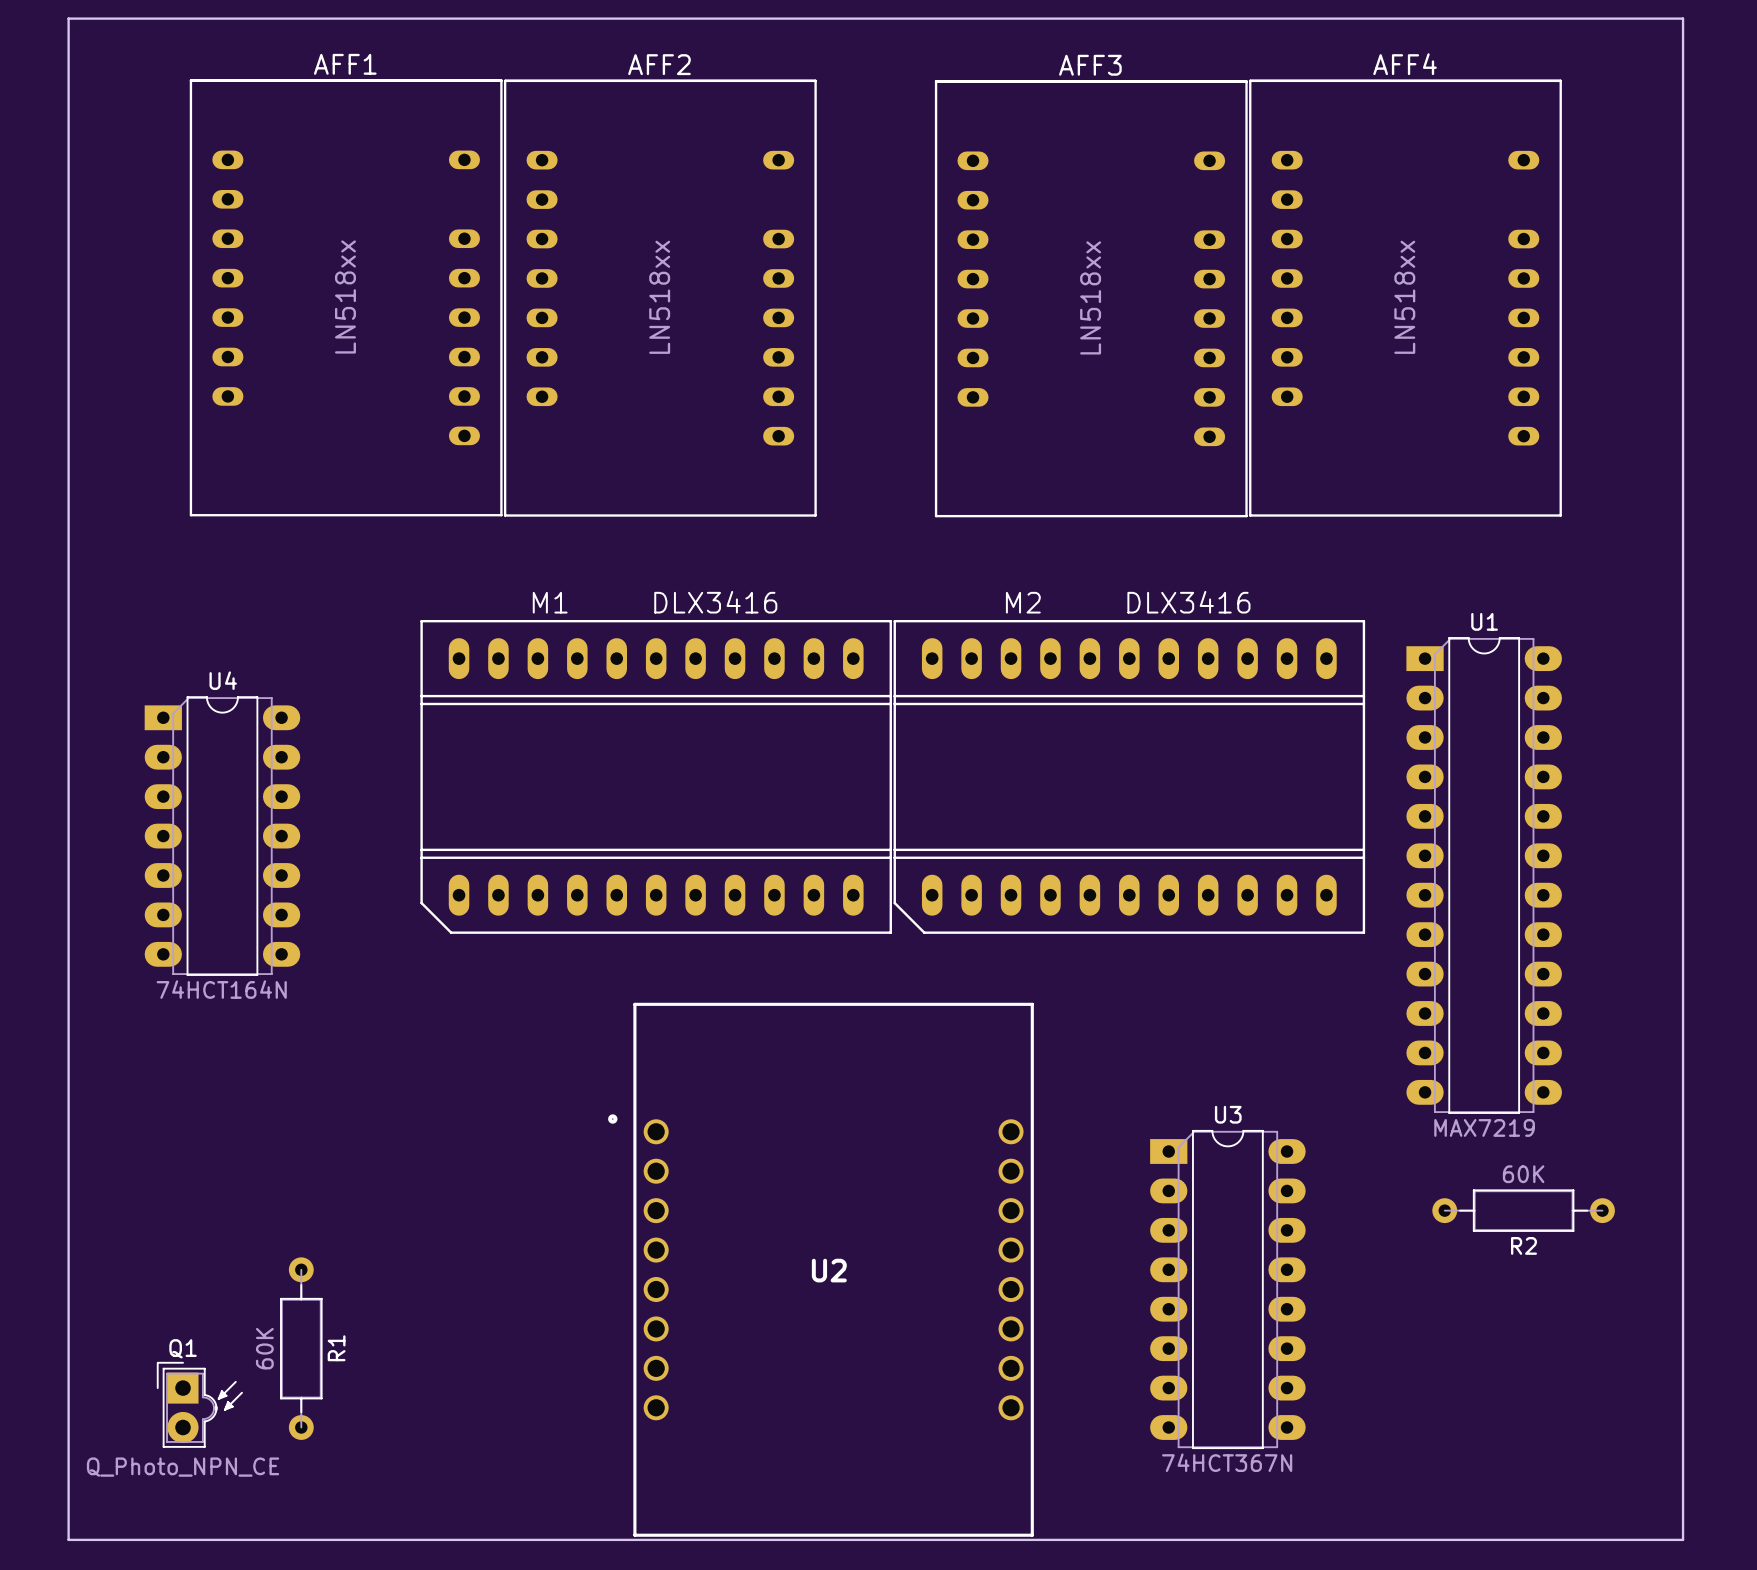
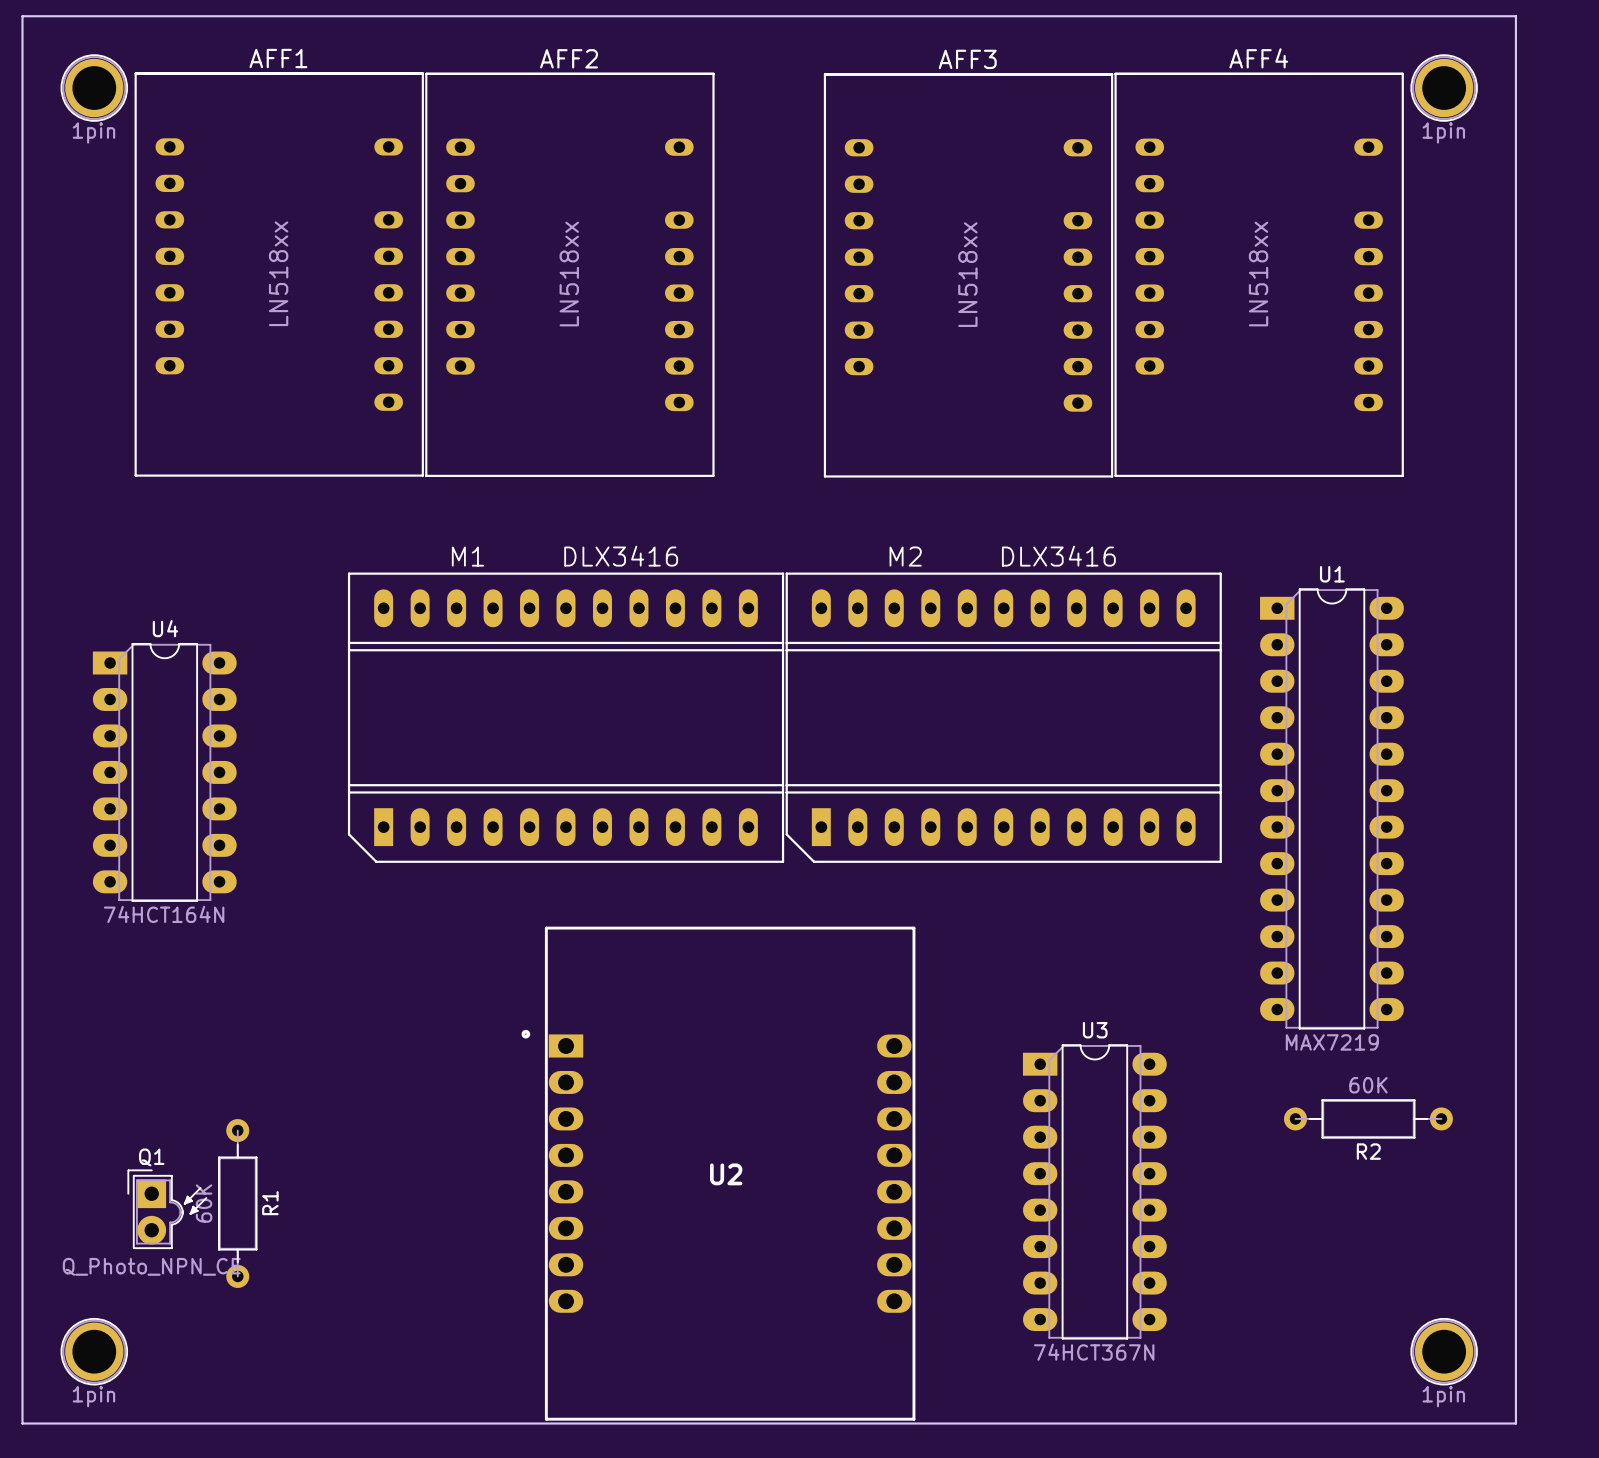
part: none -> 1pin (94, 88)
part: none -> 1pin (1444, 88)
M1 footprint: [420, 619, 892, 934] -> [347, 572, 785, 863]
M2 footprint: [893, 619, 1366, 934] -> [785, 572, 1222, 863]
U2 footprint: [608, 1002, 1034, 1537] -> [521, 926, 916, 1421]
R1 position: (301, 1348) -> (237, 1203)
Q1 position: (199, 1404) -> (167, 1209)
part: none -> 1pin (94, 1351)
part: none -> 1pin (1444, 1351)

